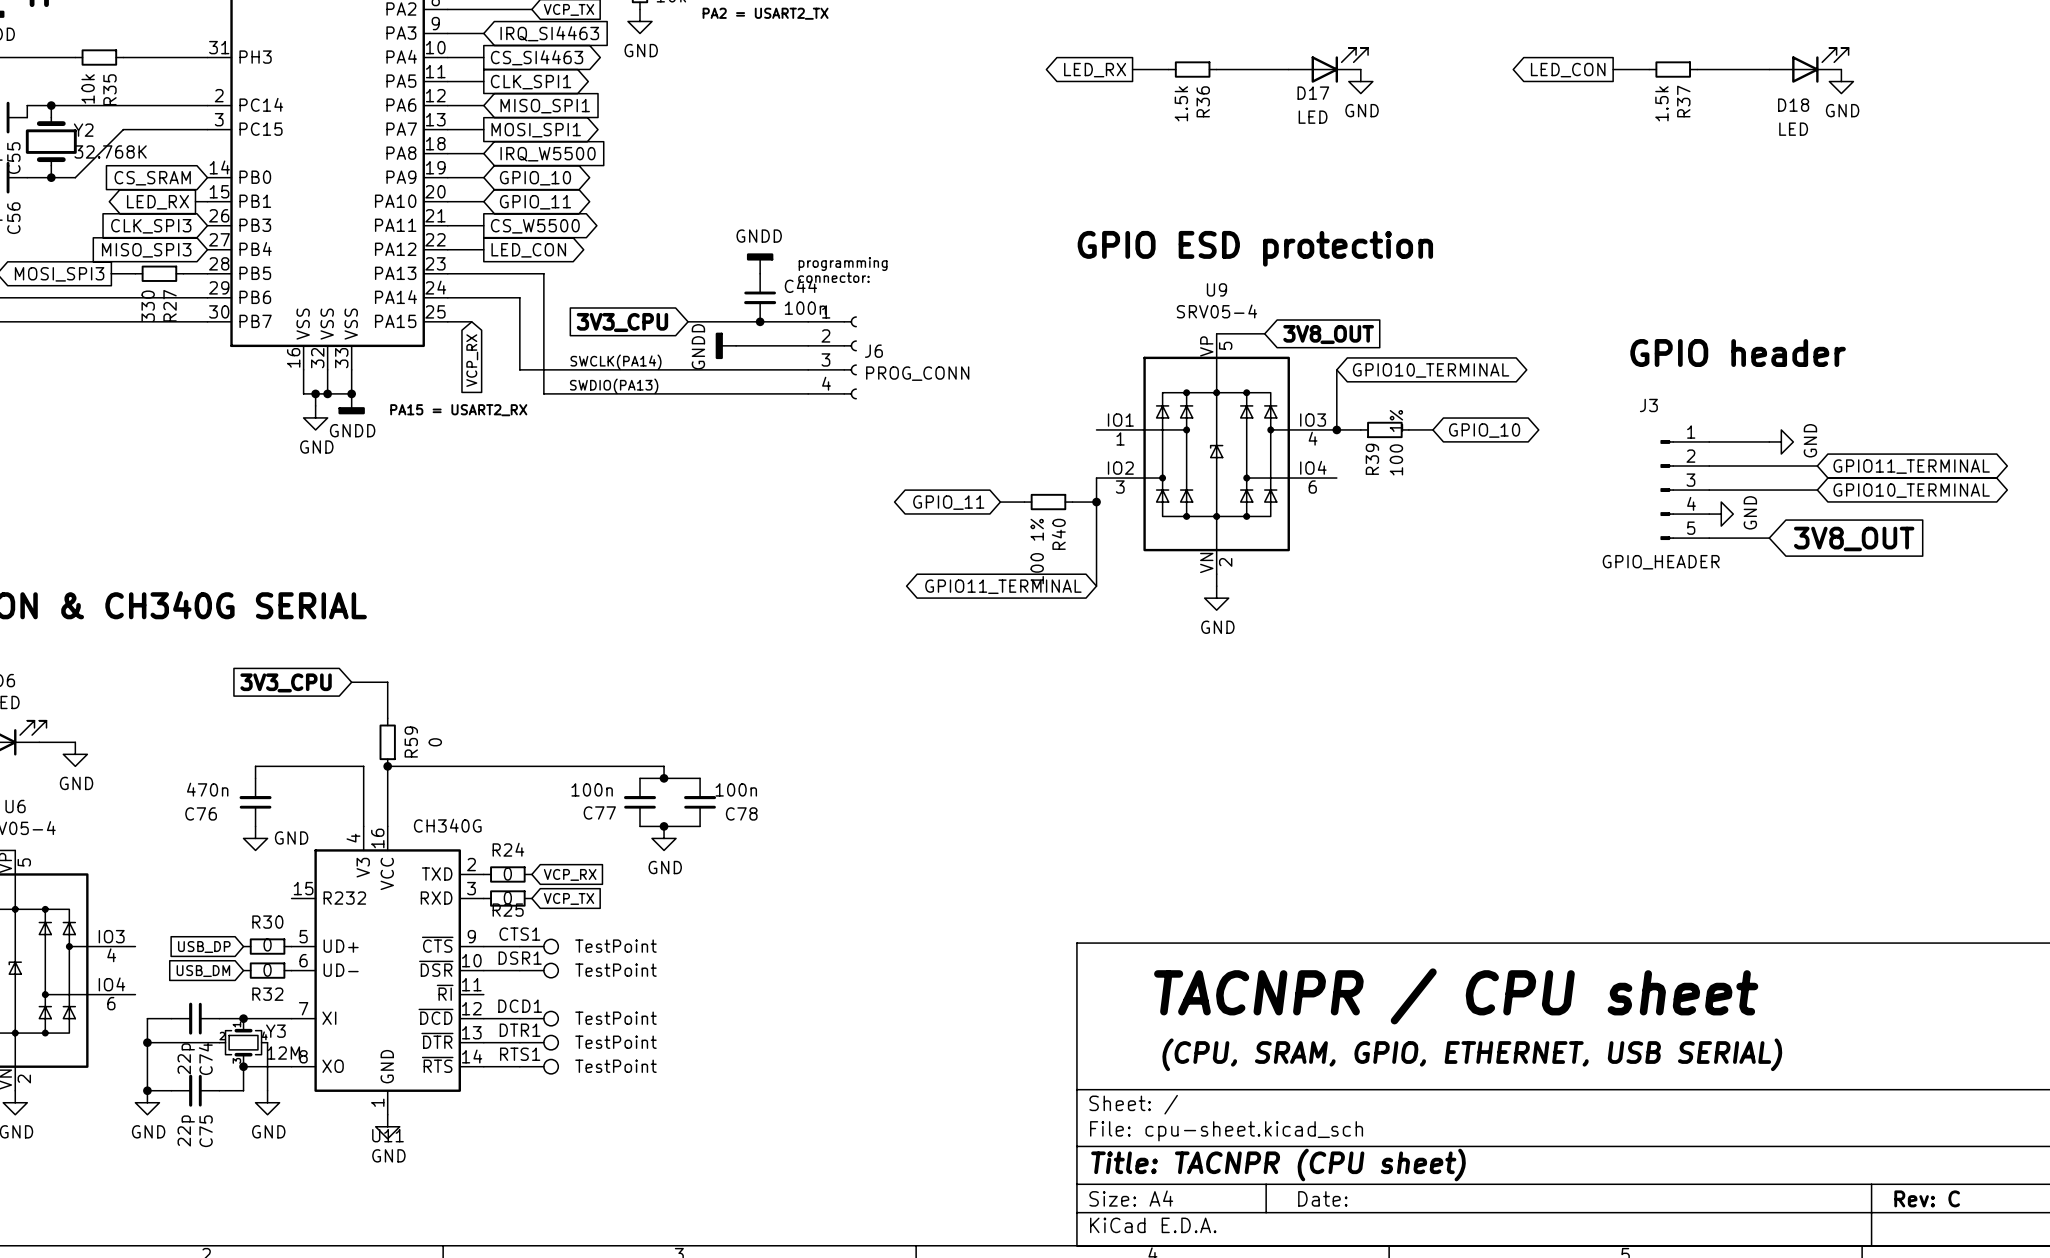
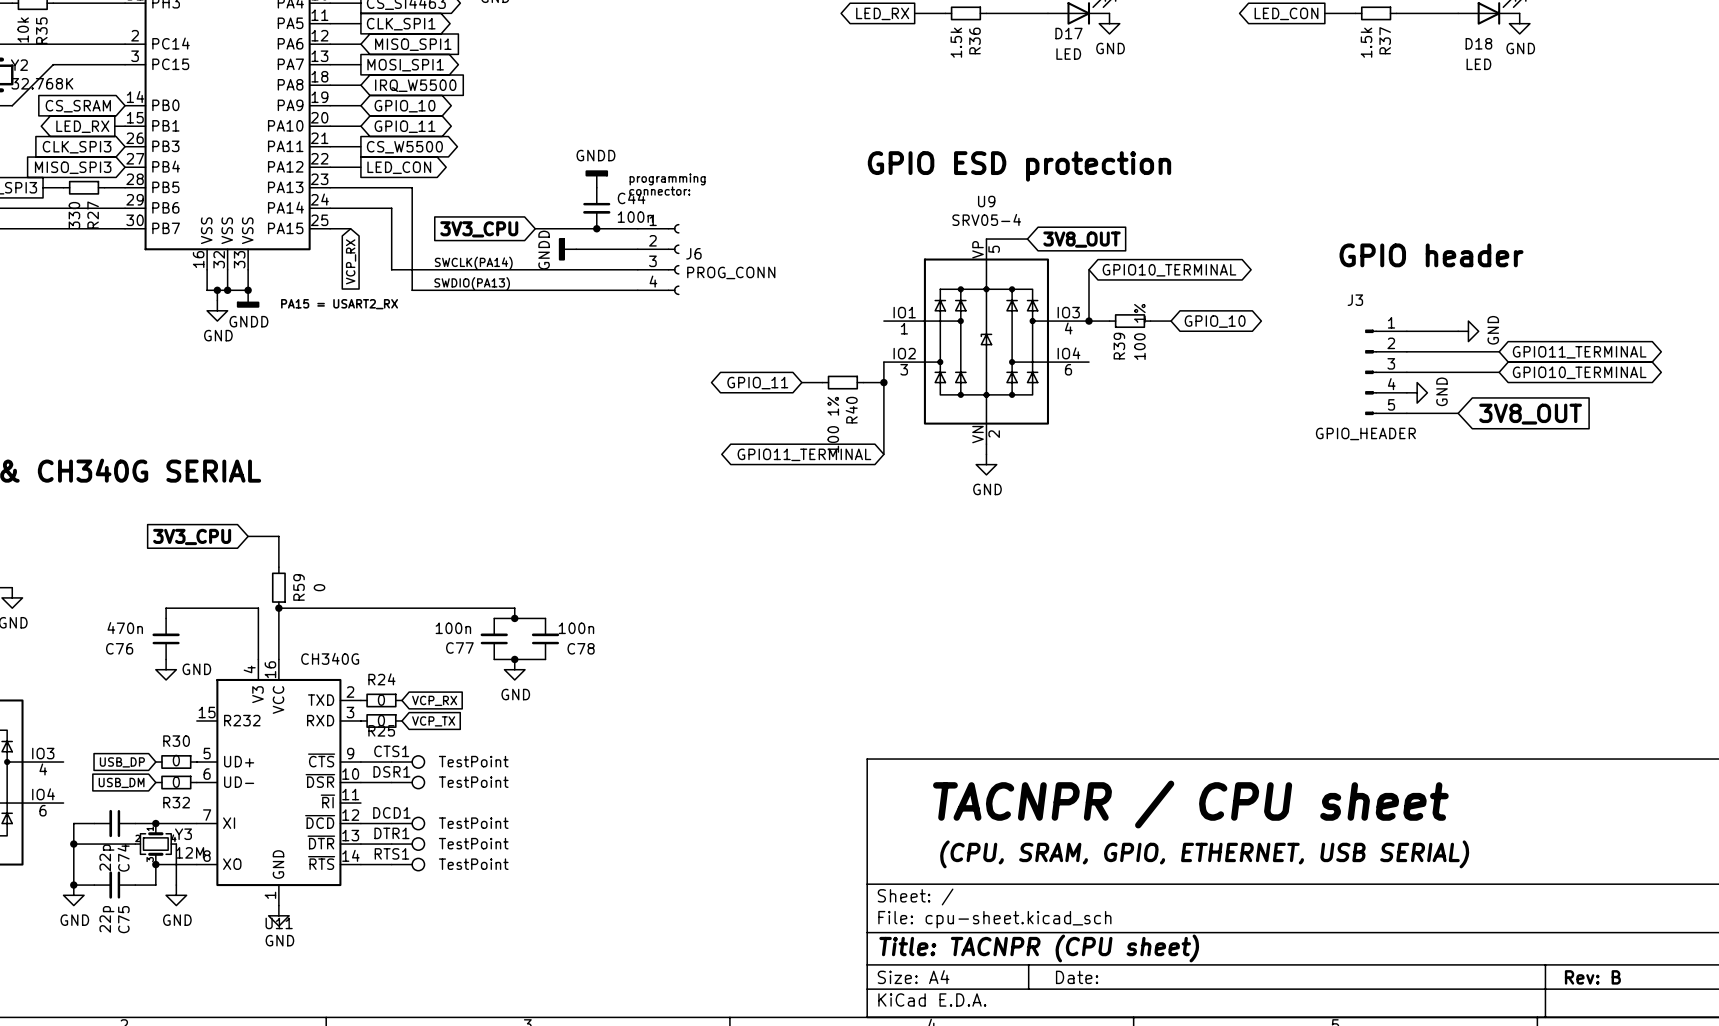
title block: Rev: C (1927, 1198) -> Rev: B (1592, 977)

